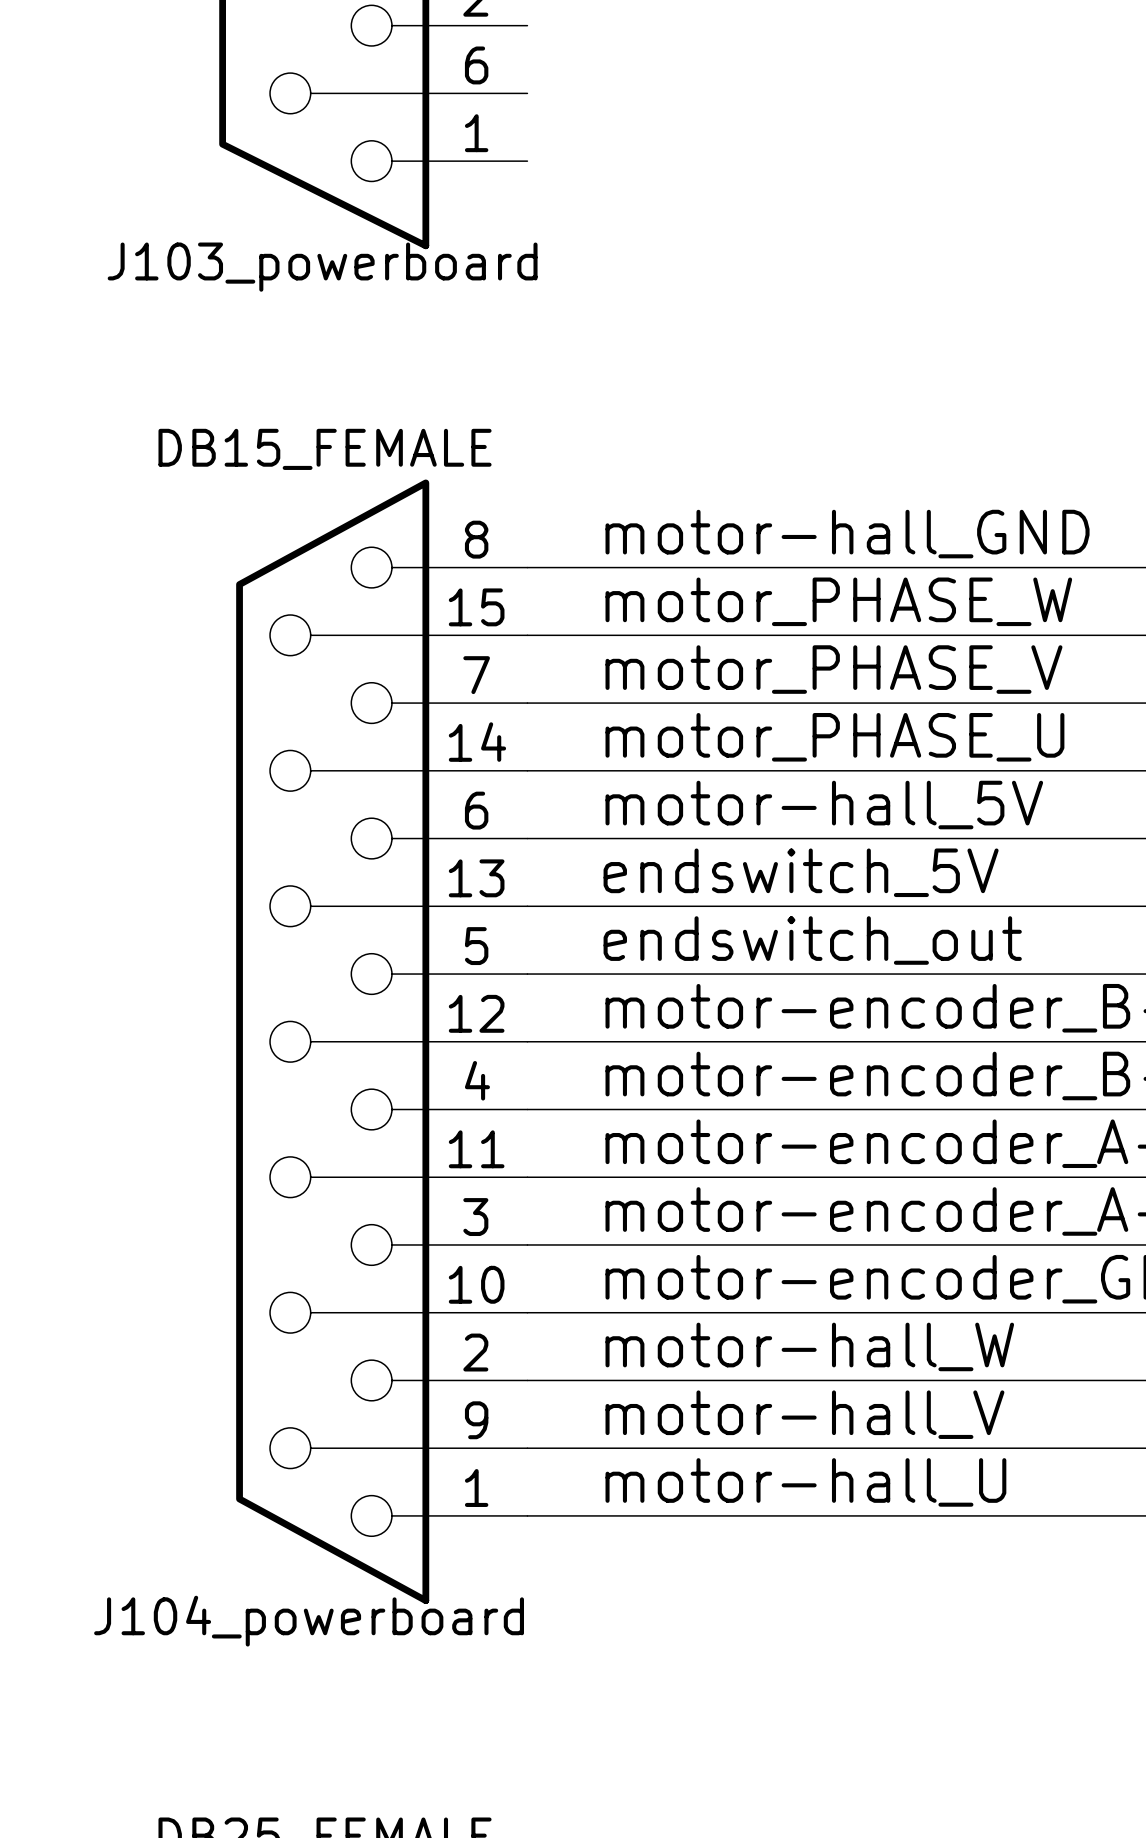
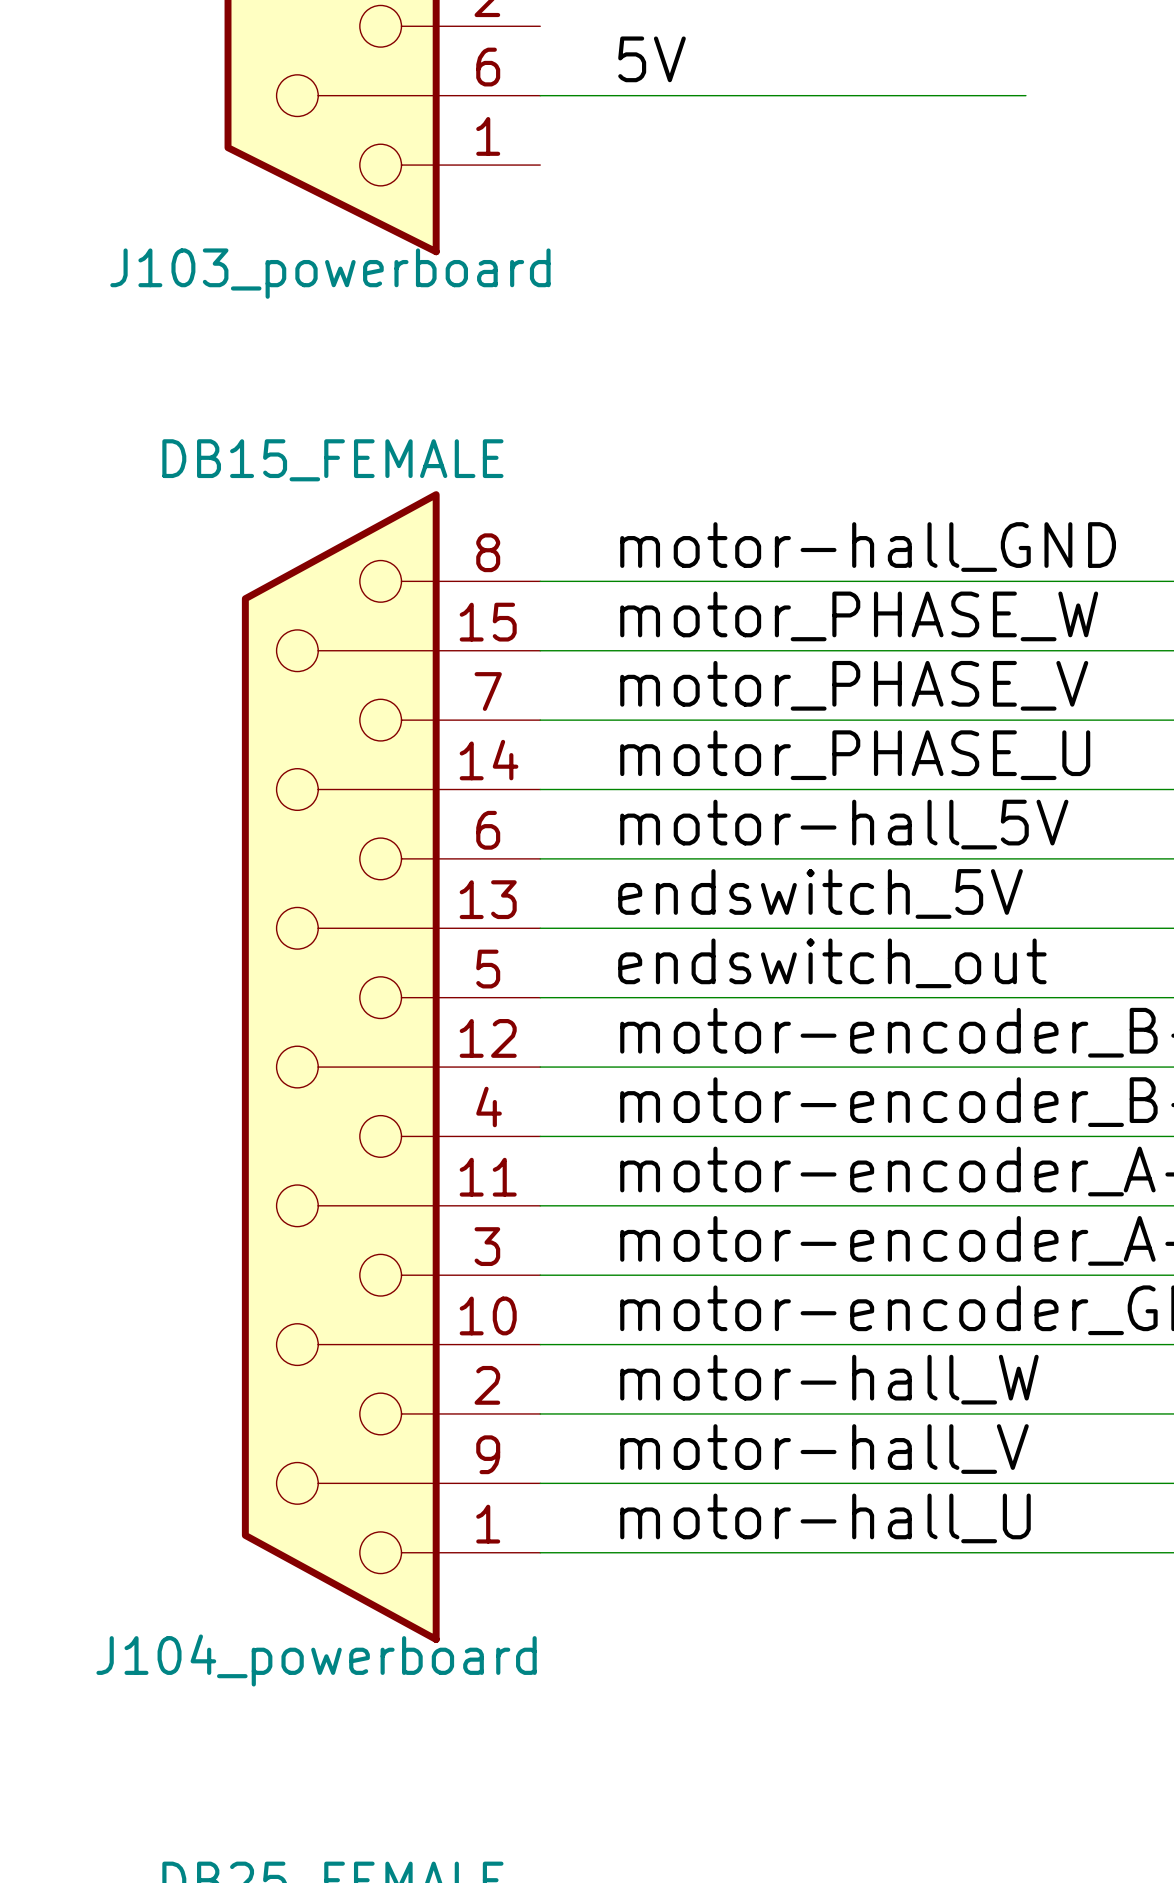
label: none -> 5V (652, 59)
wire: none -> (540, 95) (1025, 95)

